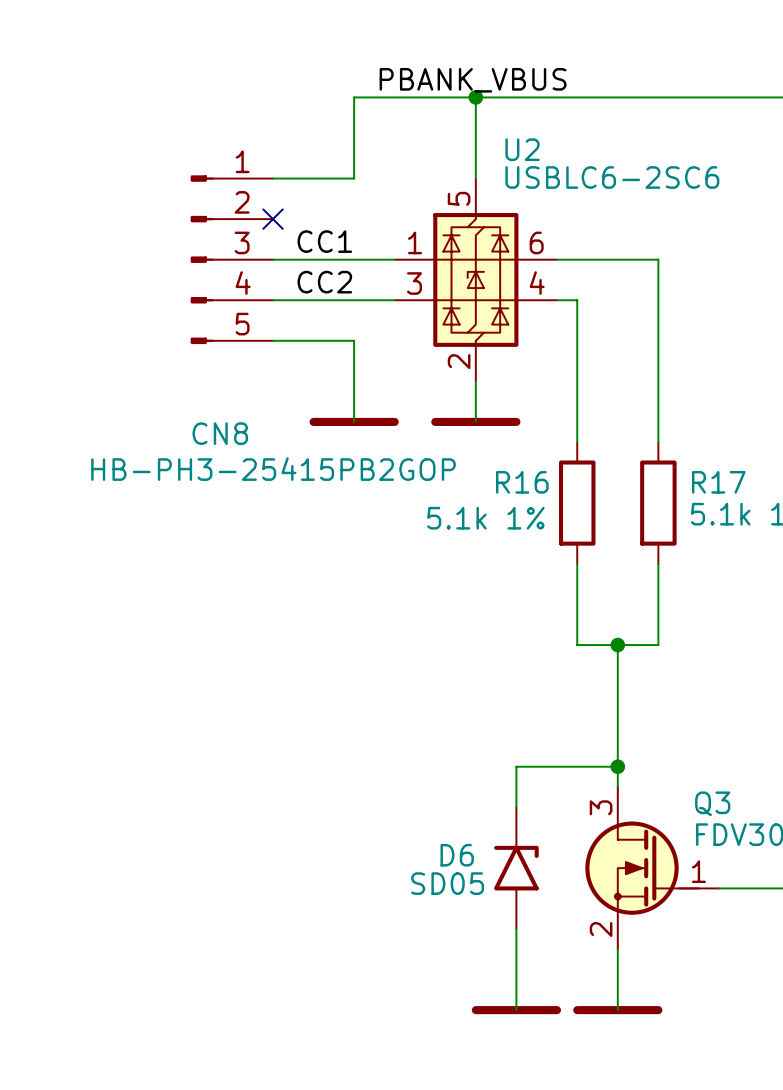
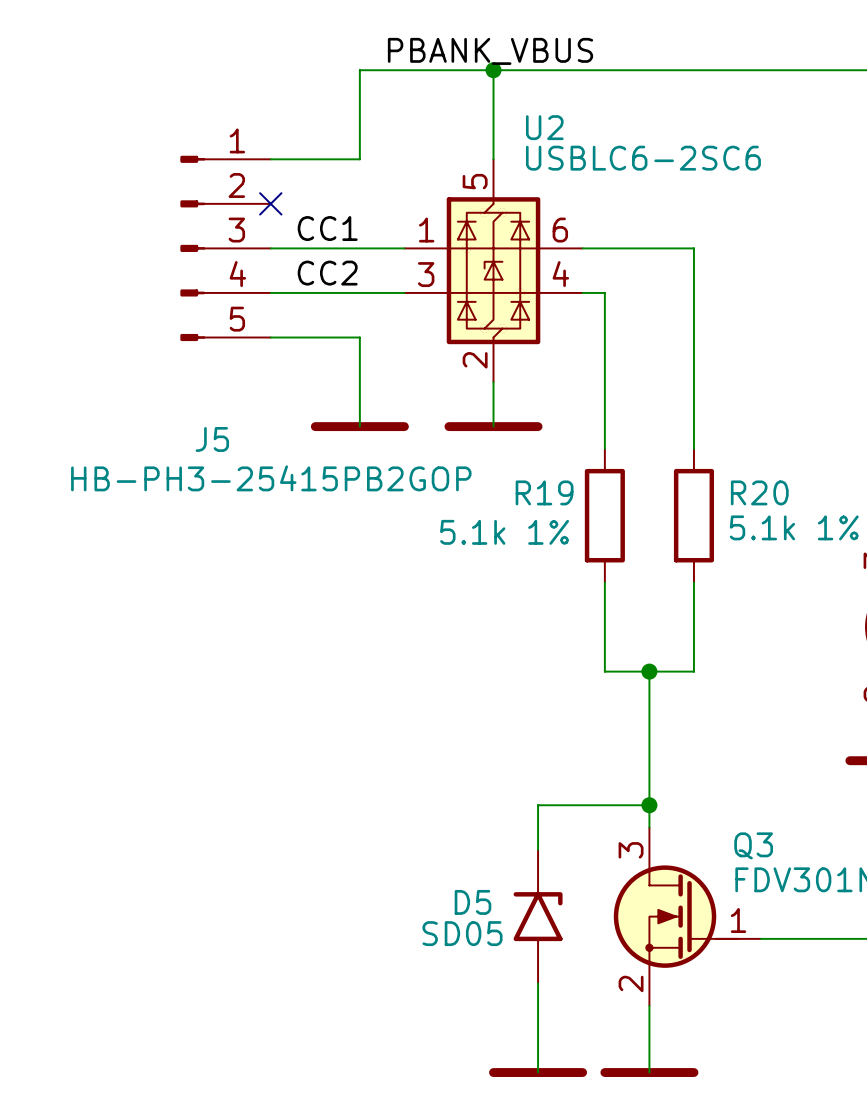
CN8 name: CN8 (220, 433) -> J5 (212, 439)
R16 name: R16 (522, 482) -> R19 (544, 492)
R17 name: R17 (718, 482) -> R20 (759, 492)
D6 name: D6 (457, 855) -> D5 (472, 902)

